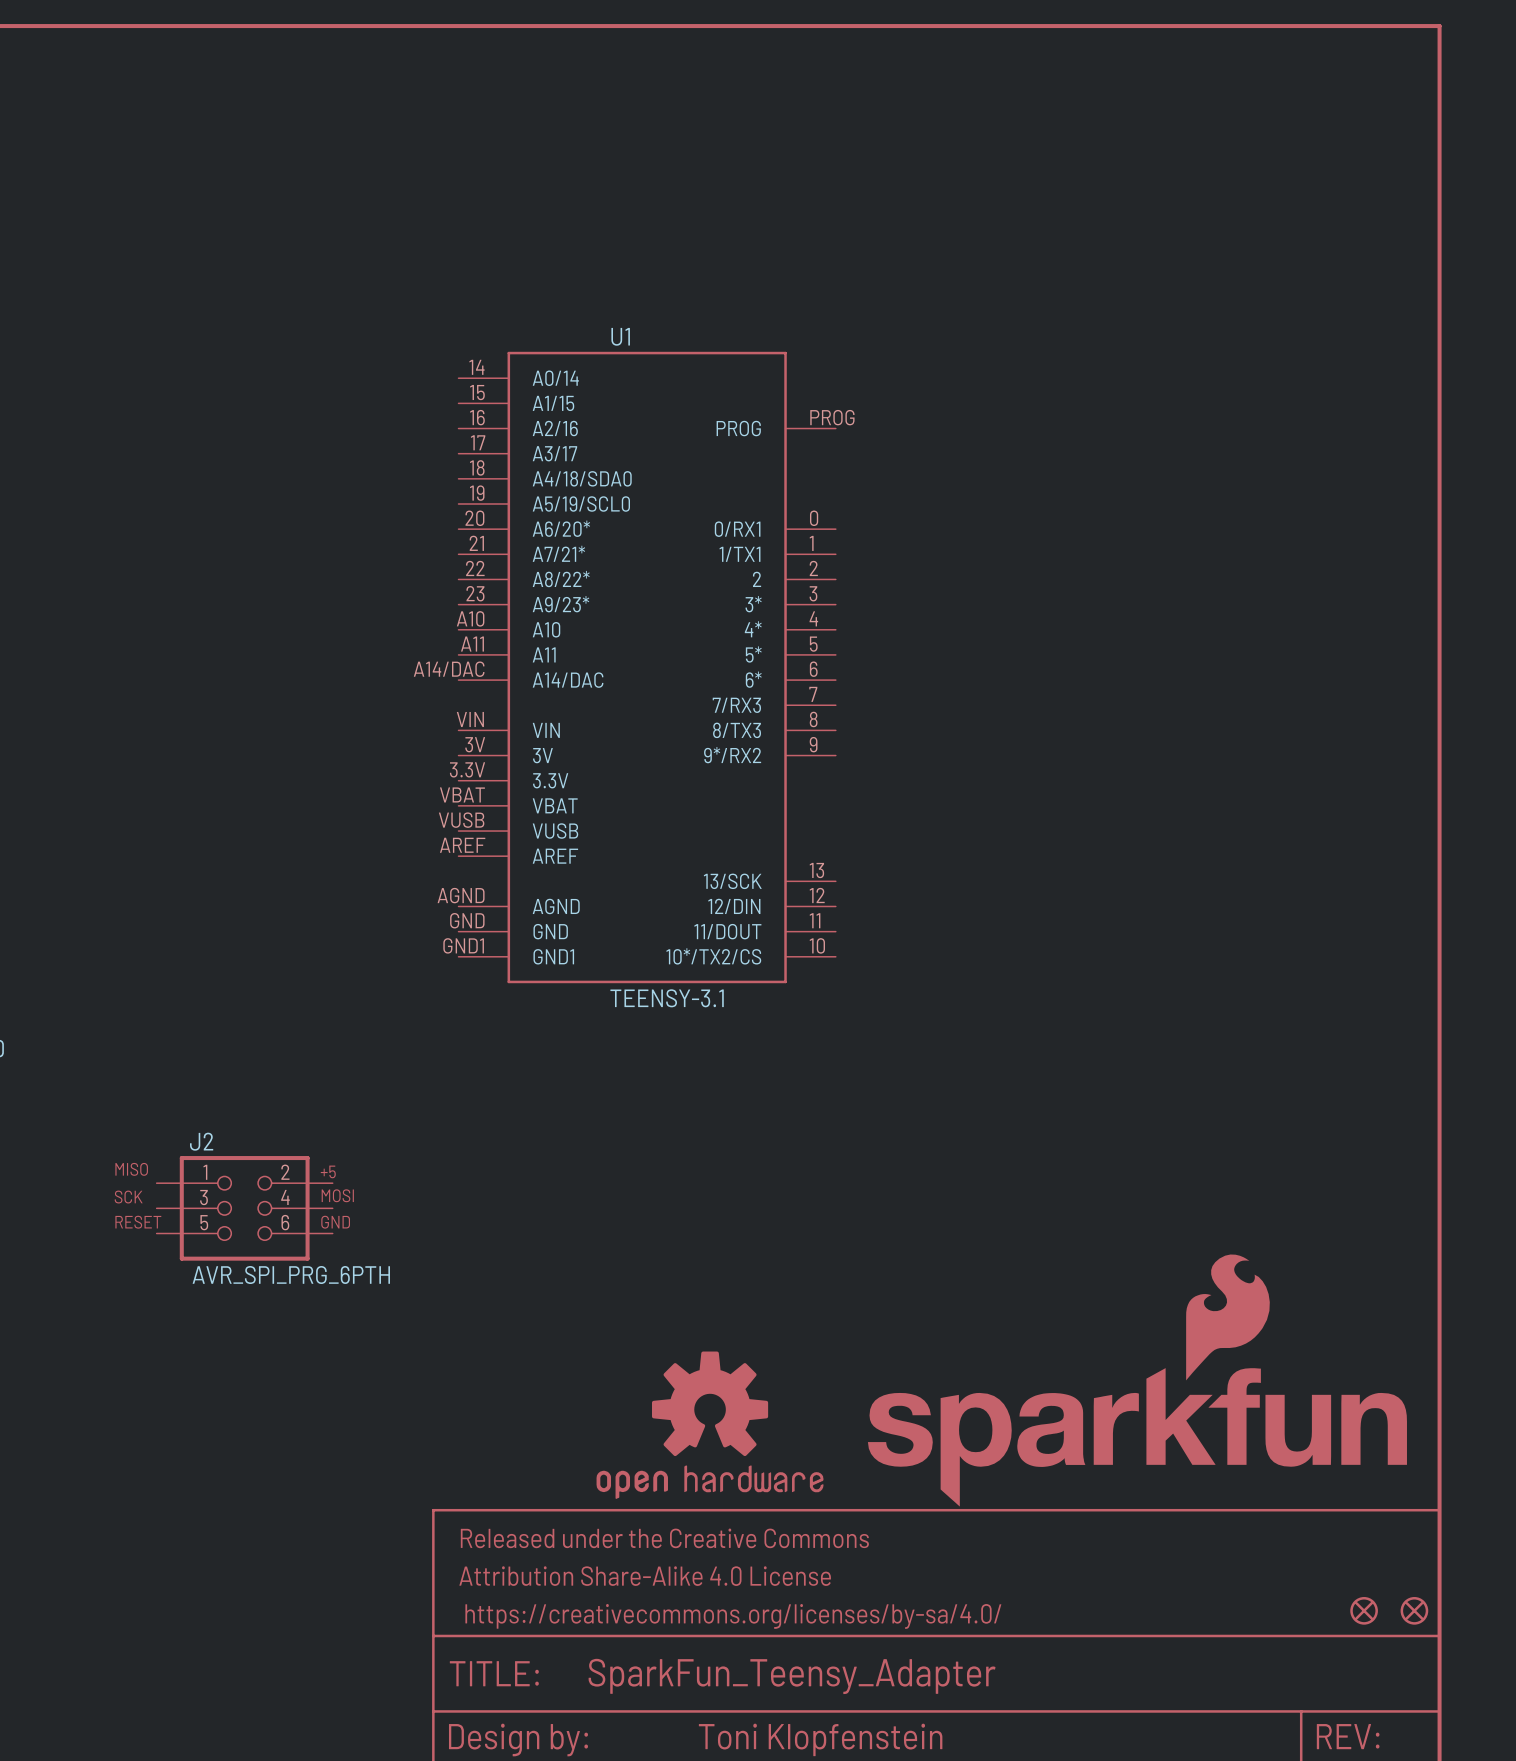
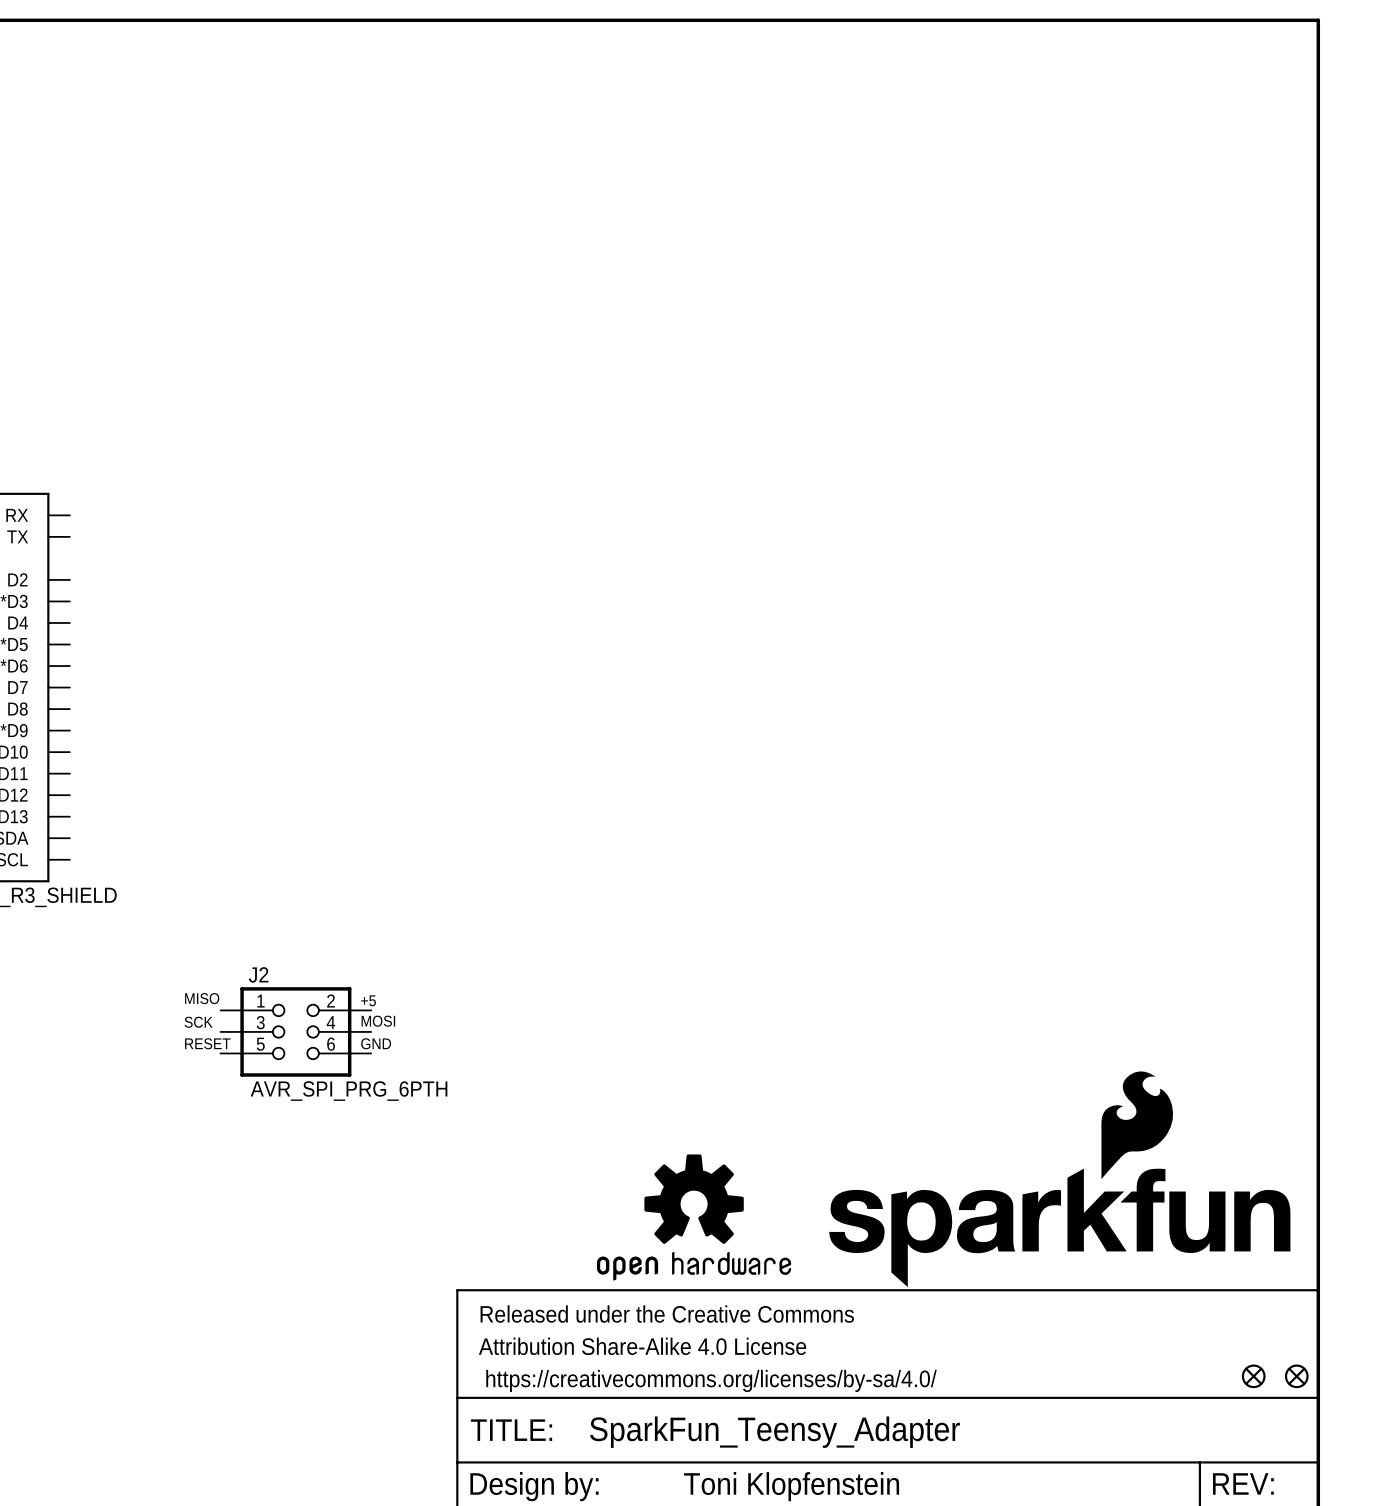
U1: TEENSY-3.1 (647, 667) -> none

